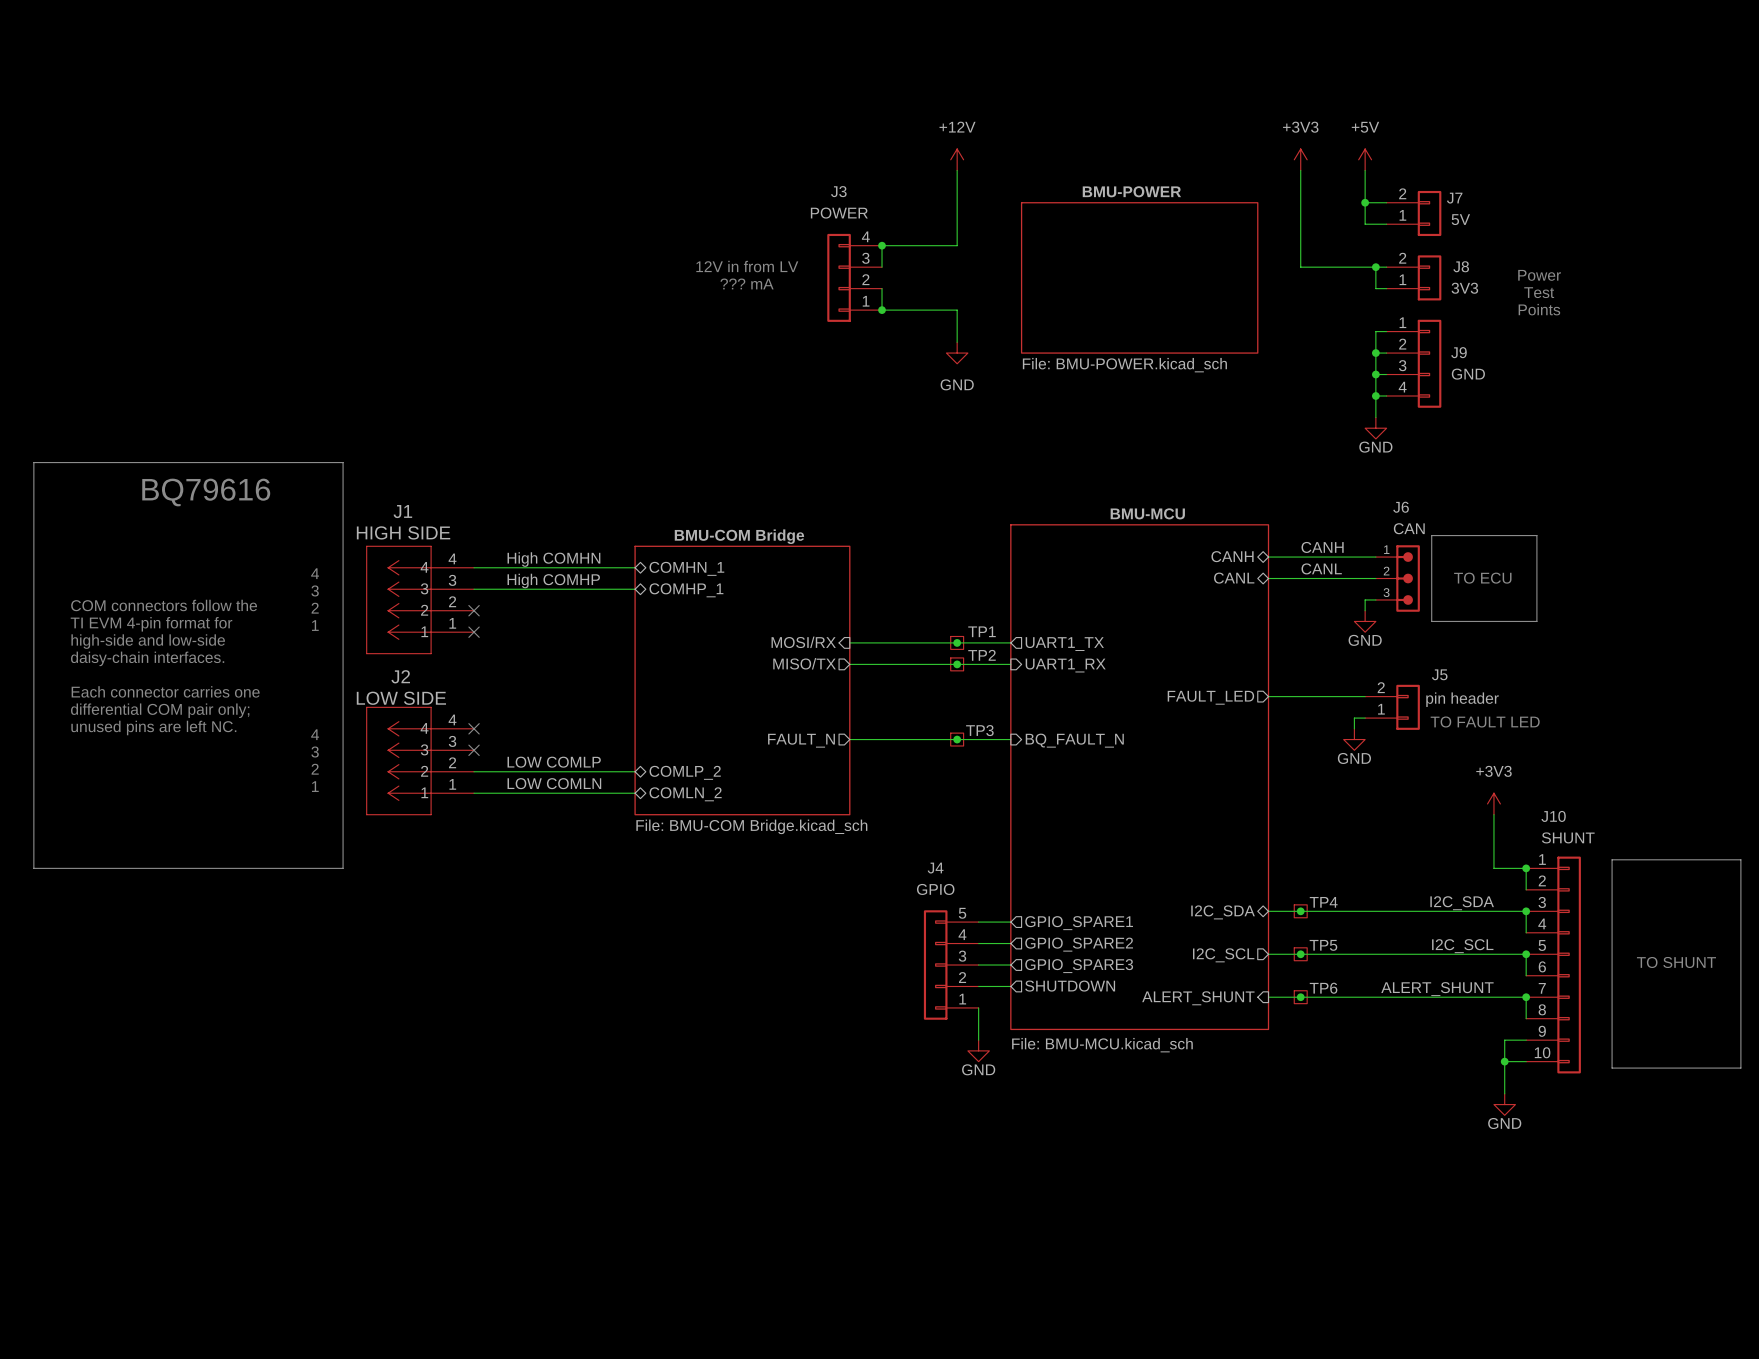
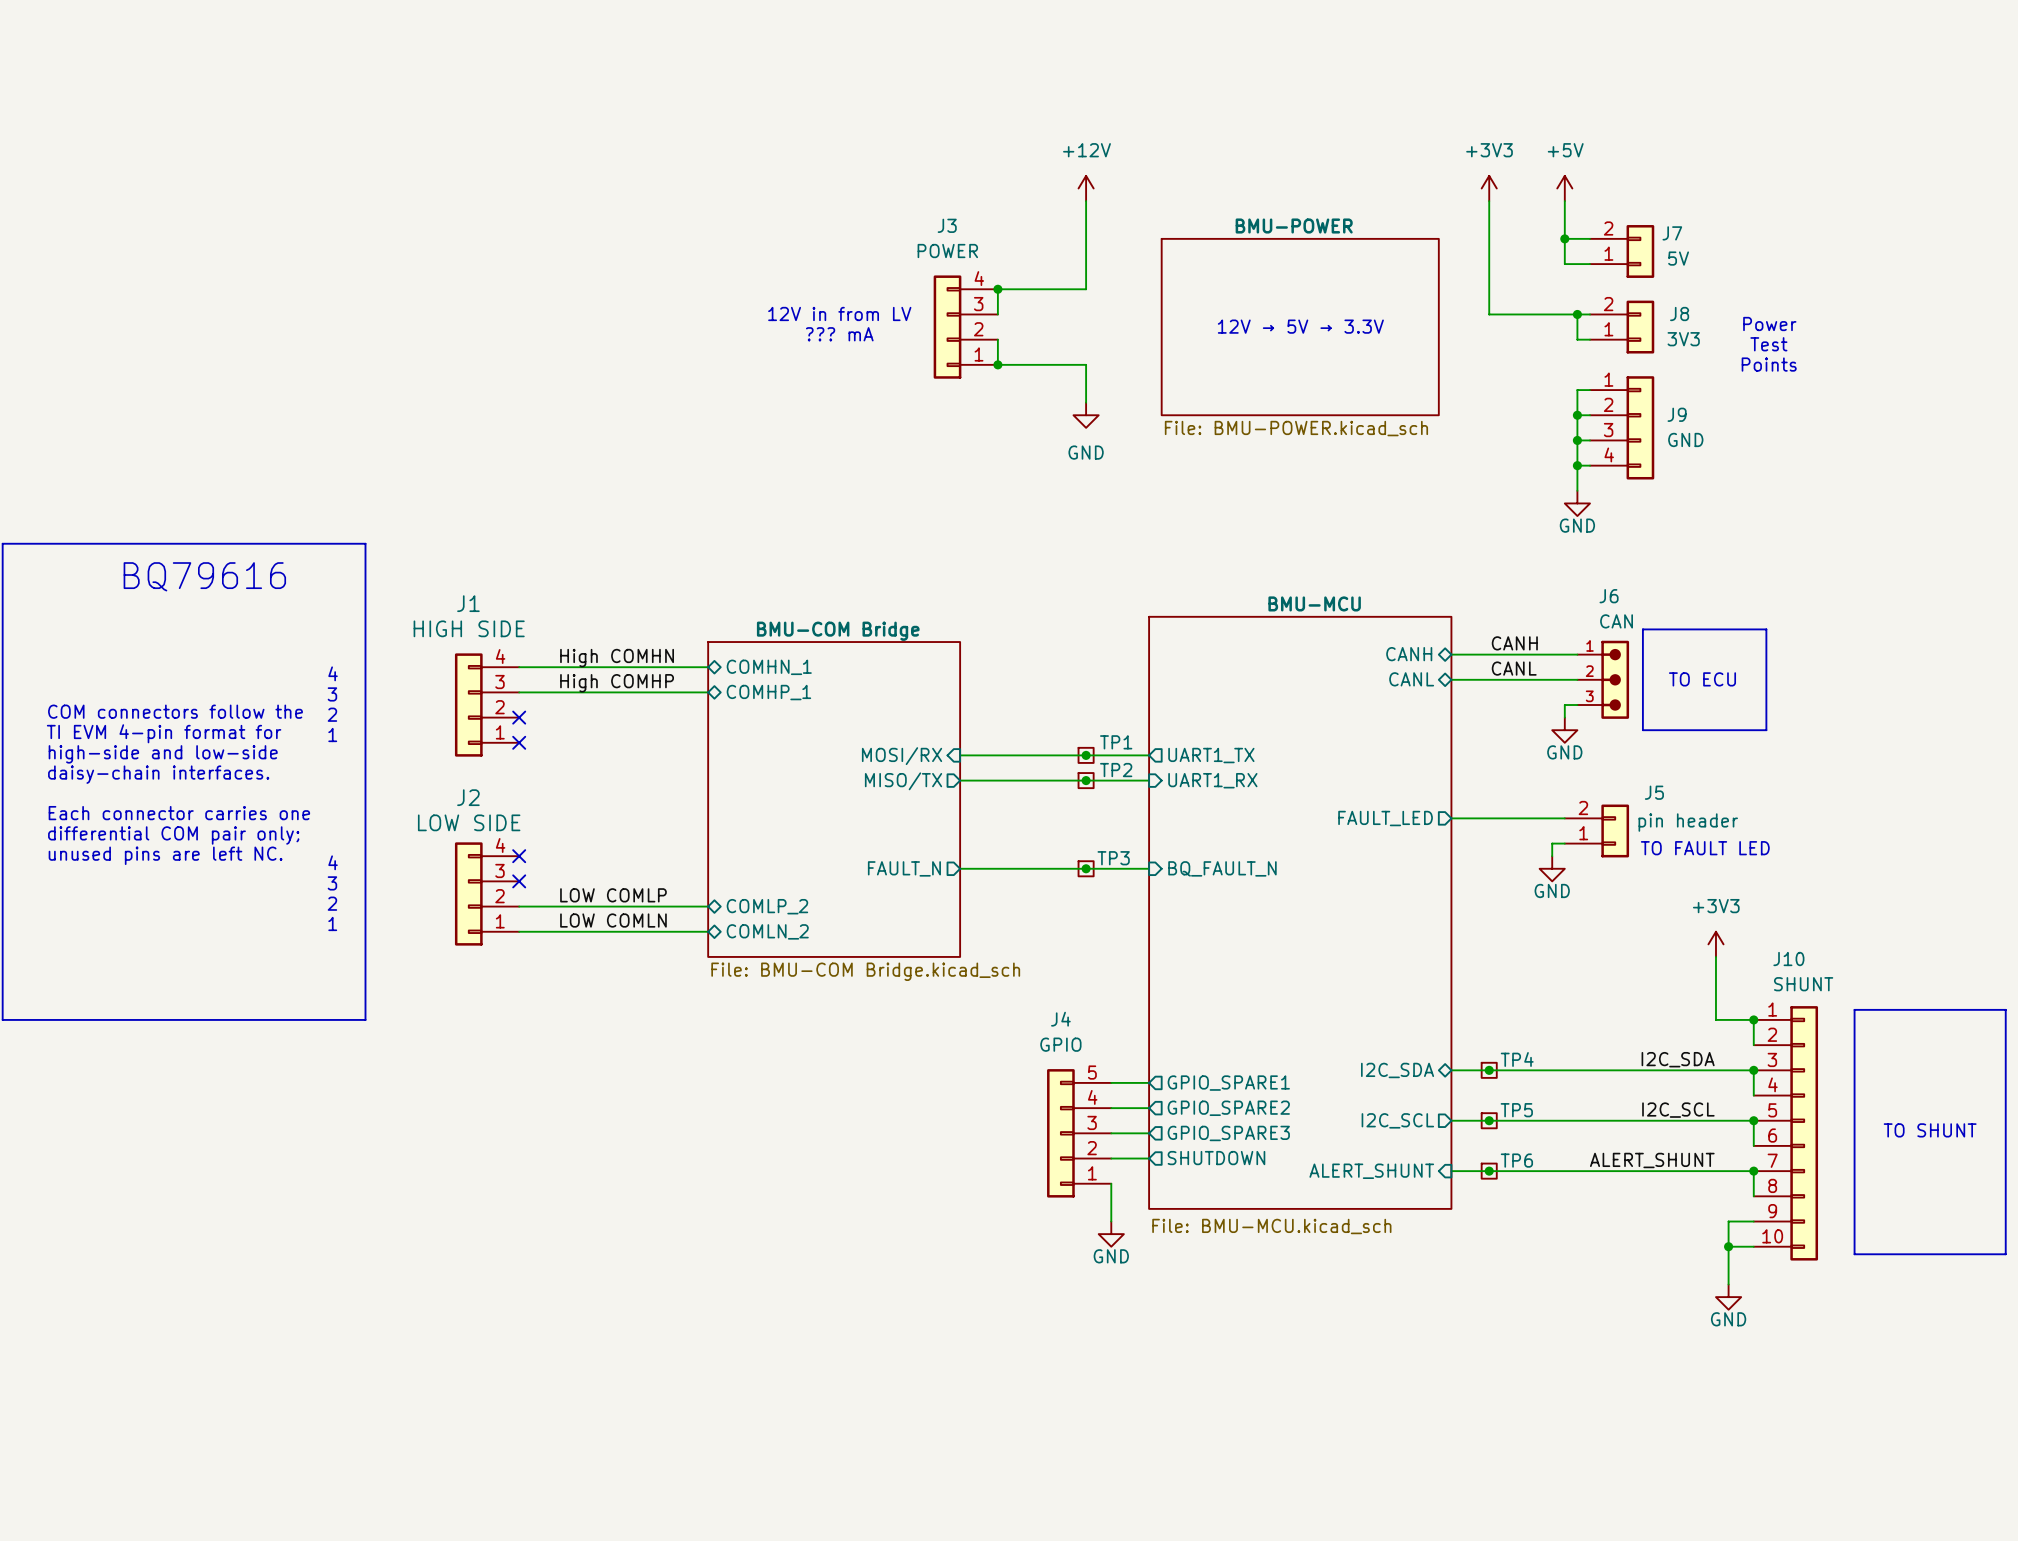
text: none -> 12V → 5V → 3.3V (1300, 326)
J1 symbol: [366, 545, 475, 655] -> [454, 653, 520, 757]
J2 symbol: [366, 706, 475, 816] -> [454, 842, 520, 946]

